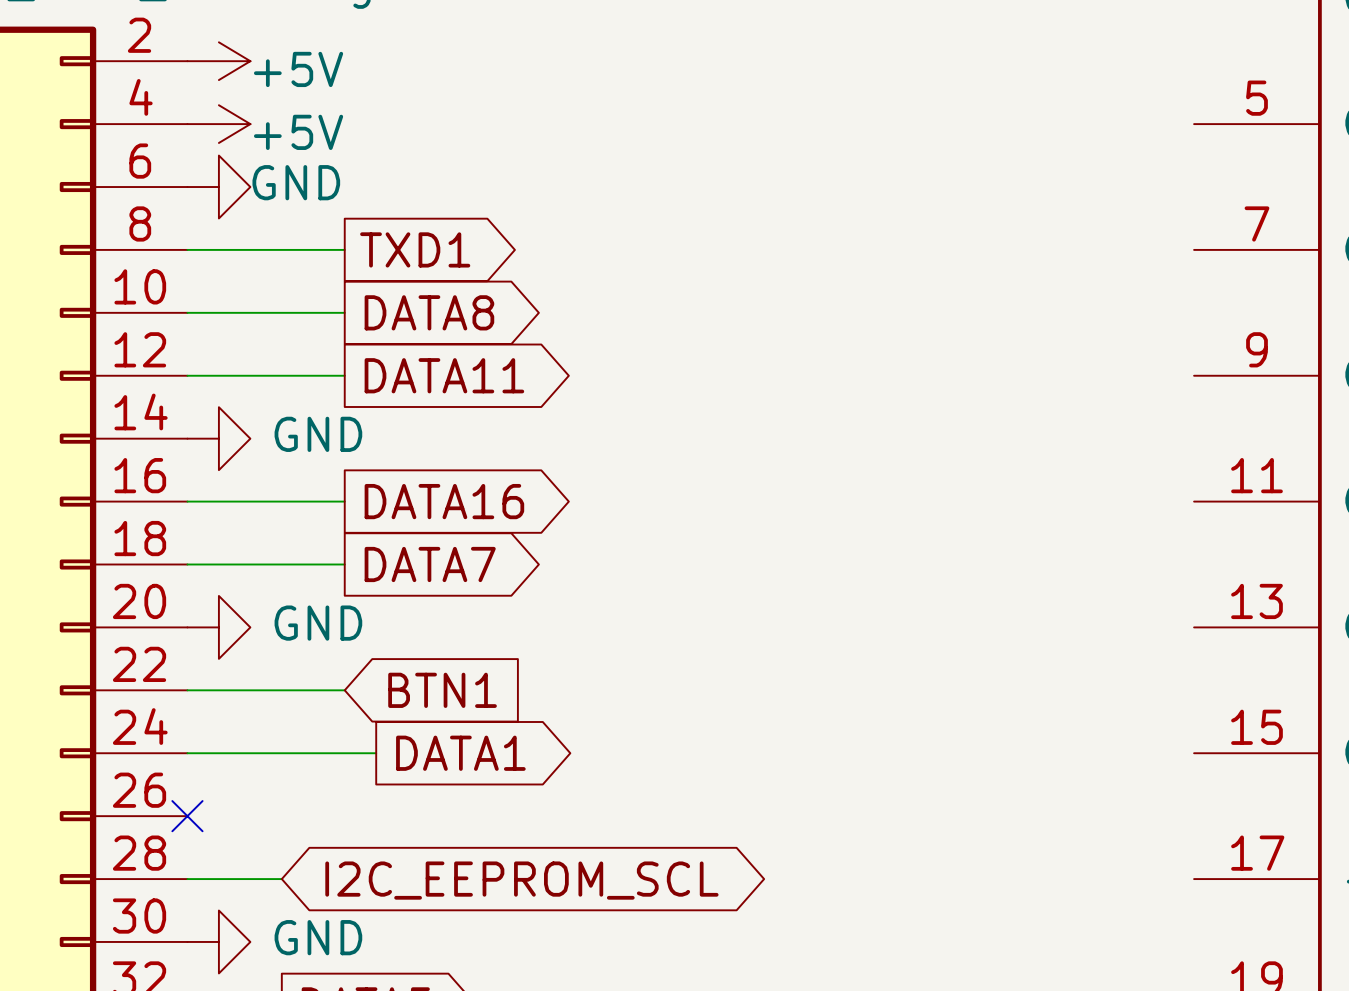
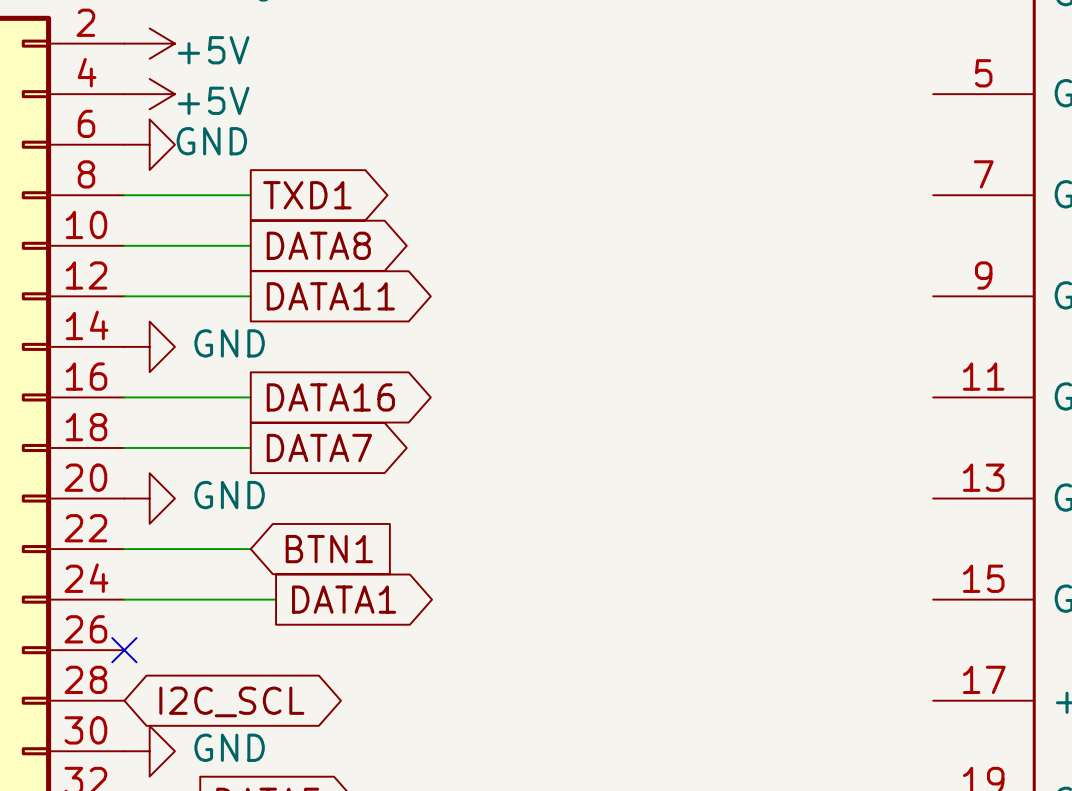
wire: (187, 879) (281, 879) -> none
global label: I2C_EEPROM_SCL (521, 880) -> I2C_SCL (231, 701)

